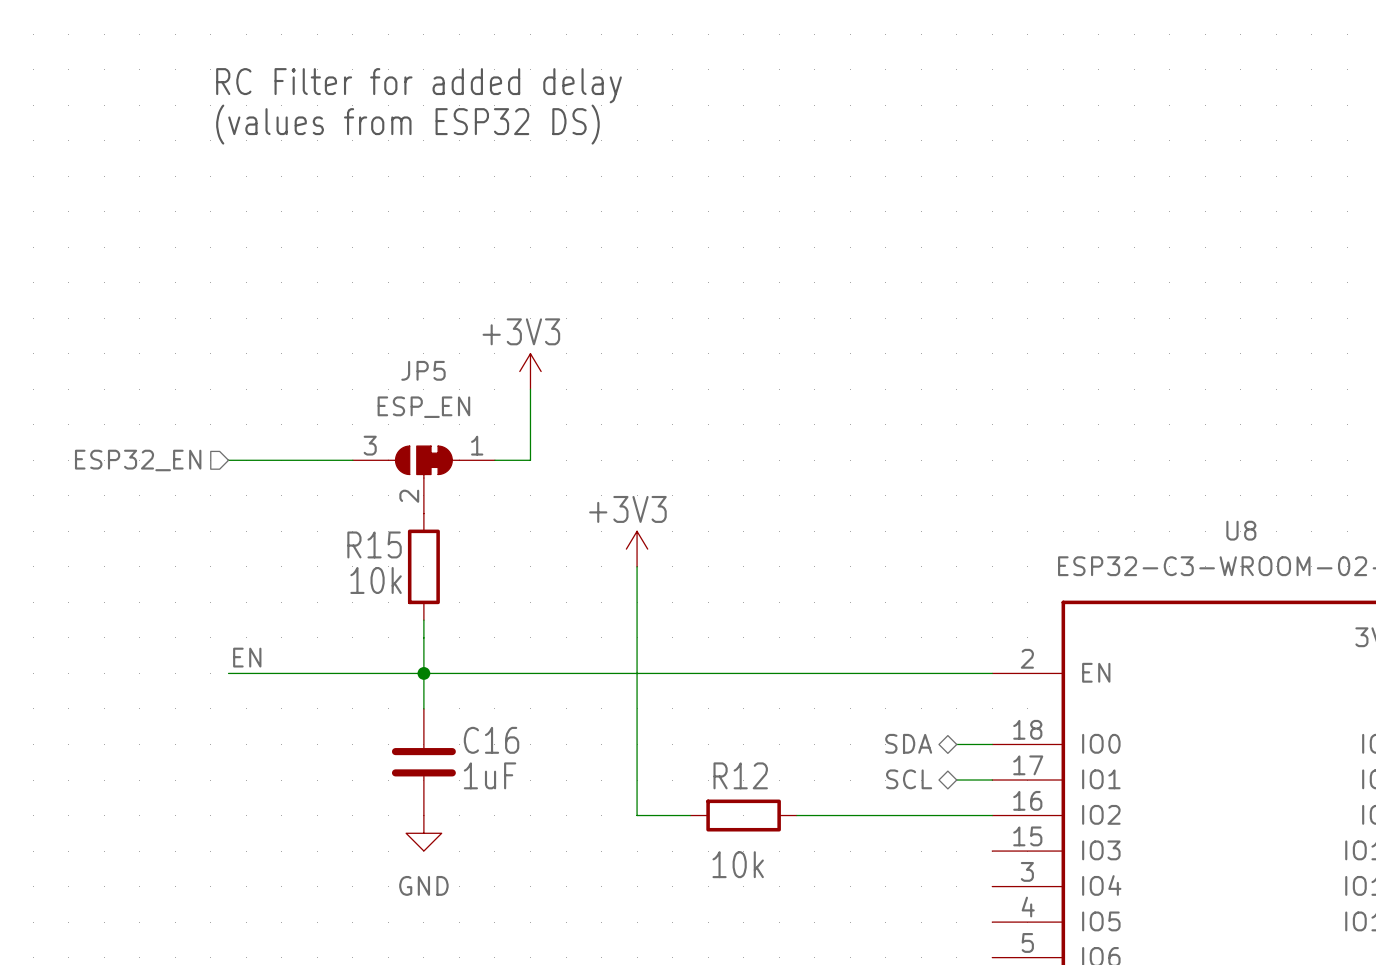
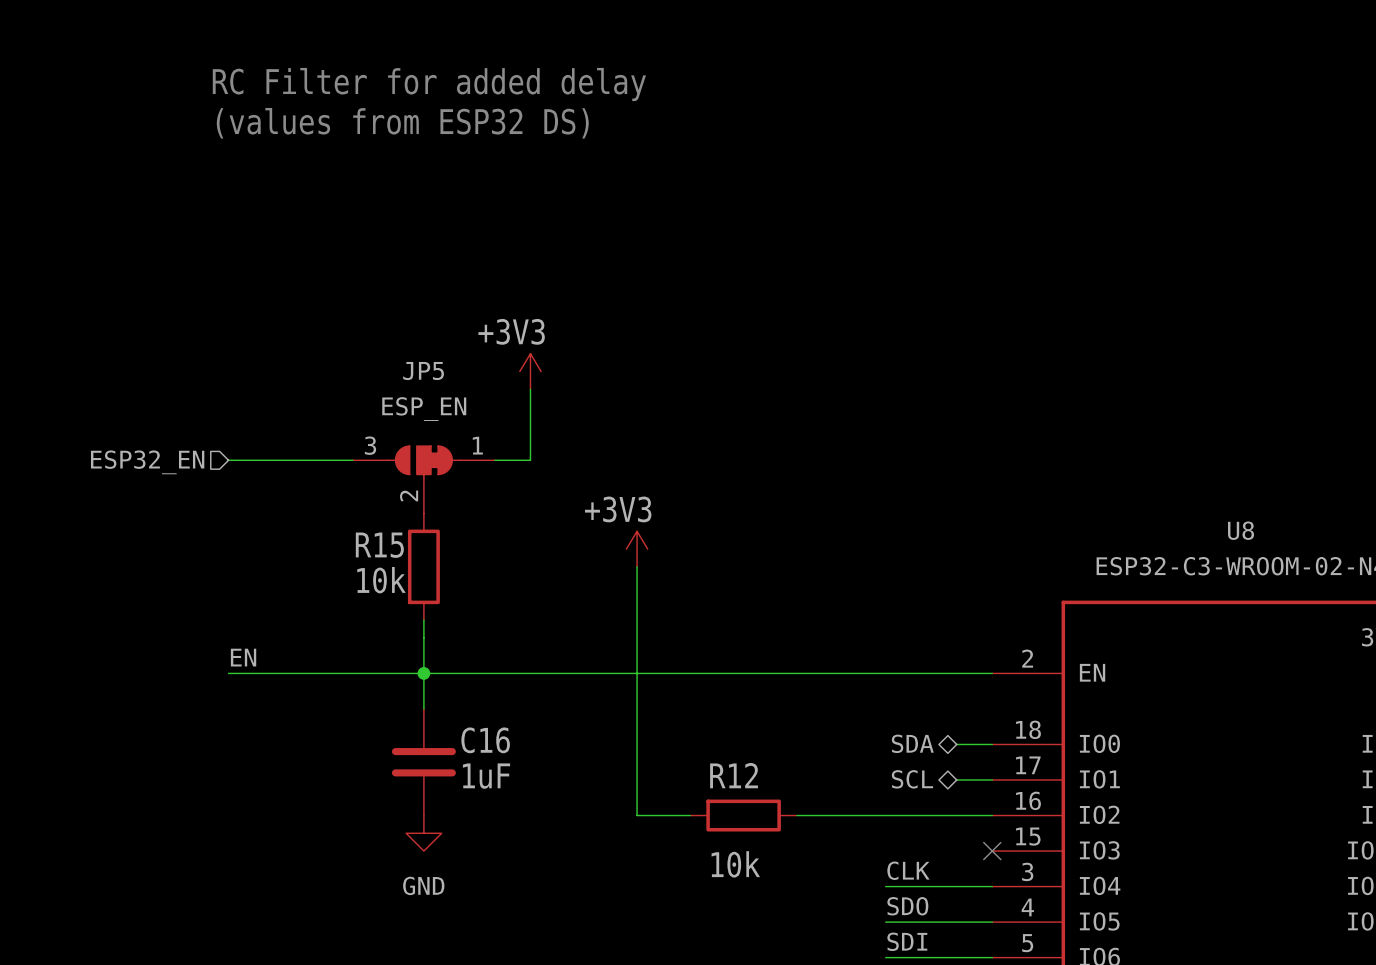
no-connect mark: none -> (992, 851)
label: none -> CLK (908, 870)
wire: none -> (885, 886) (992, 886)
label: none -> SDO (907, 906)
wire: none -> (885, 922) (992, 922)
label: none -> SDI (907, 941)
wire: none -> (885, 957) (992, 957)

